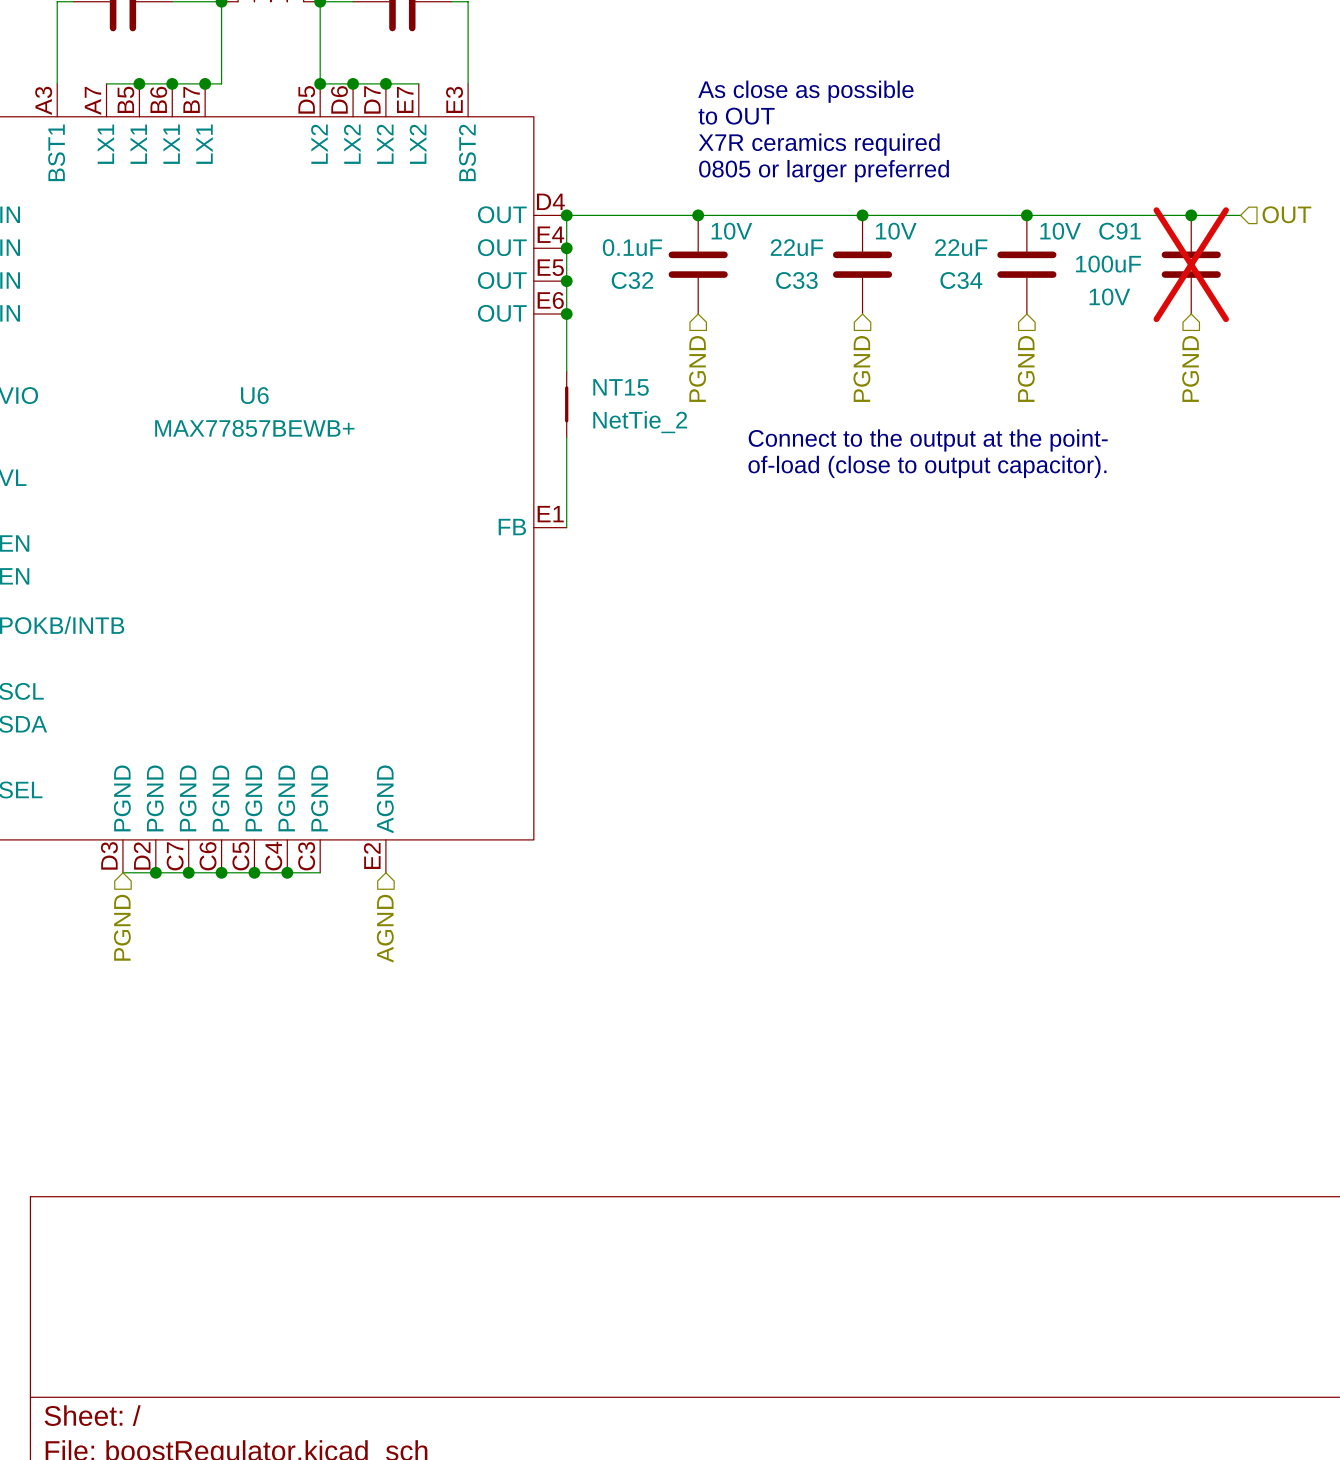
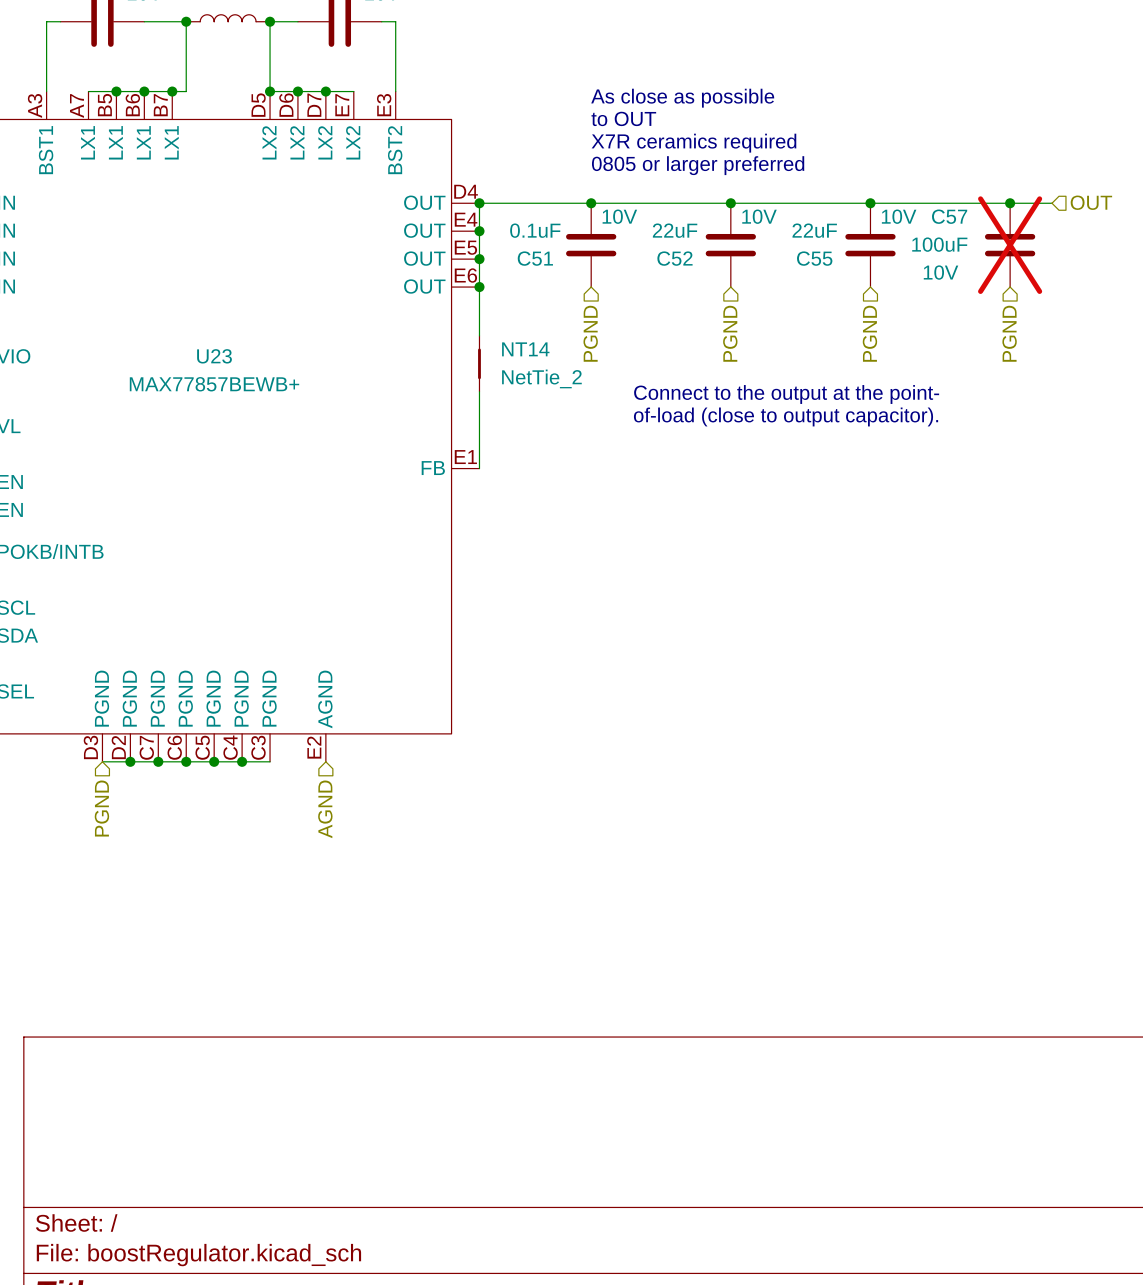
C91 name: C91 (1120, 231) -> C57 (949, 216)
C32 name: C32 (632, 280) -> C51 (535, 258)
C33 name: C33 (796, 280) -> C52 (674, 258)
C34 name: C34 (961, 280) -> C55 (814, 258)
NT15 name: NT15 (621, 387) -> NT14 (525, 349)
U6 name: U6 (254, 395) -> U23 (214, 356)

